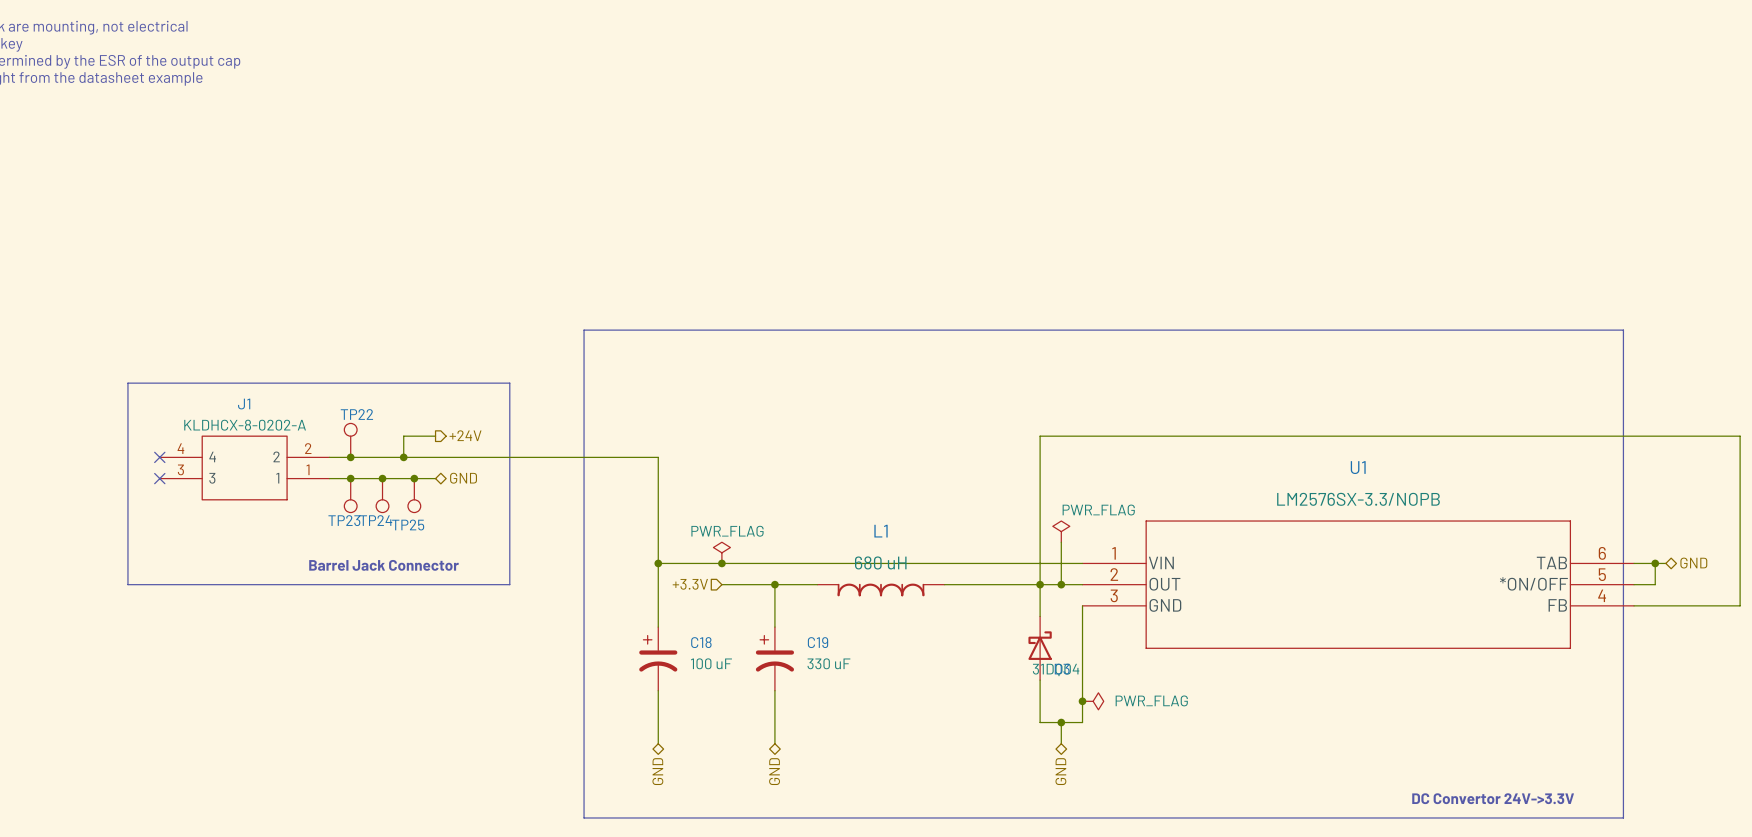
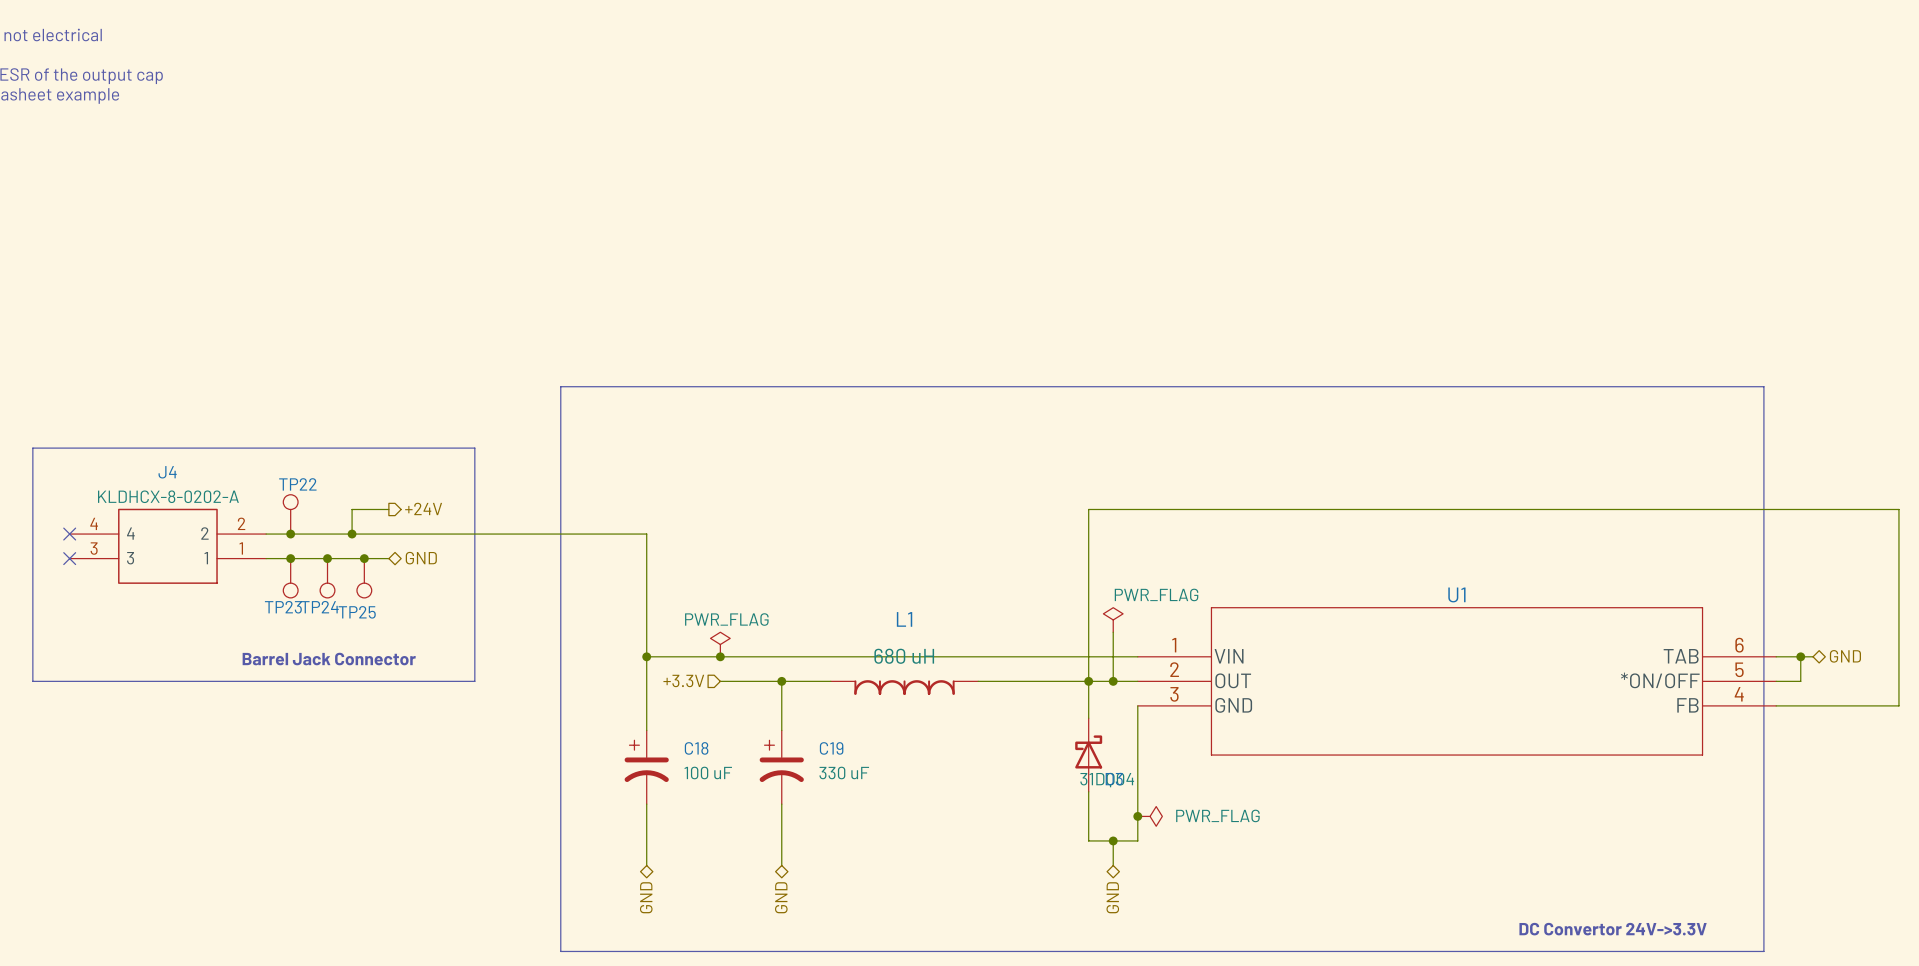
J1 name: J1 (244, 404) -> J4 (167, 472)
U1 name position: U1 (1358, 467) -> U1 (1456, 594)
U1 value: LM2576SX-3.3/NOPB (1358, 499) -> none

